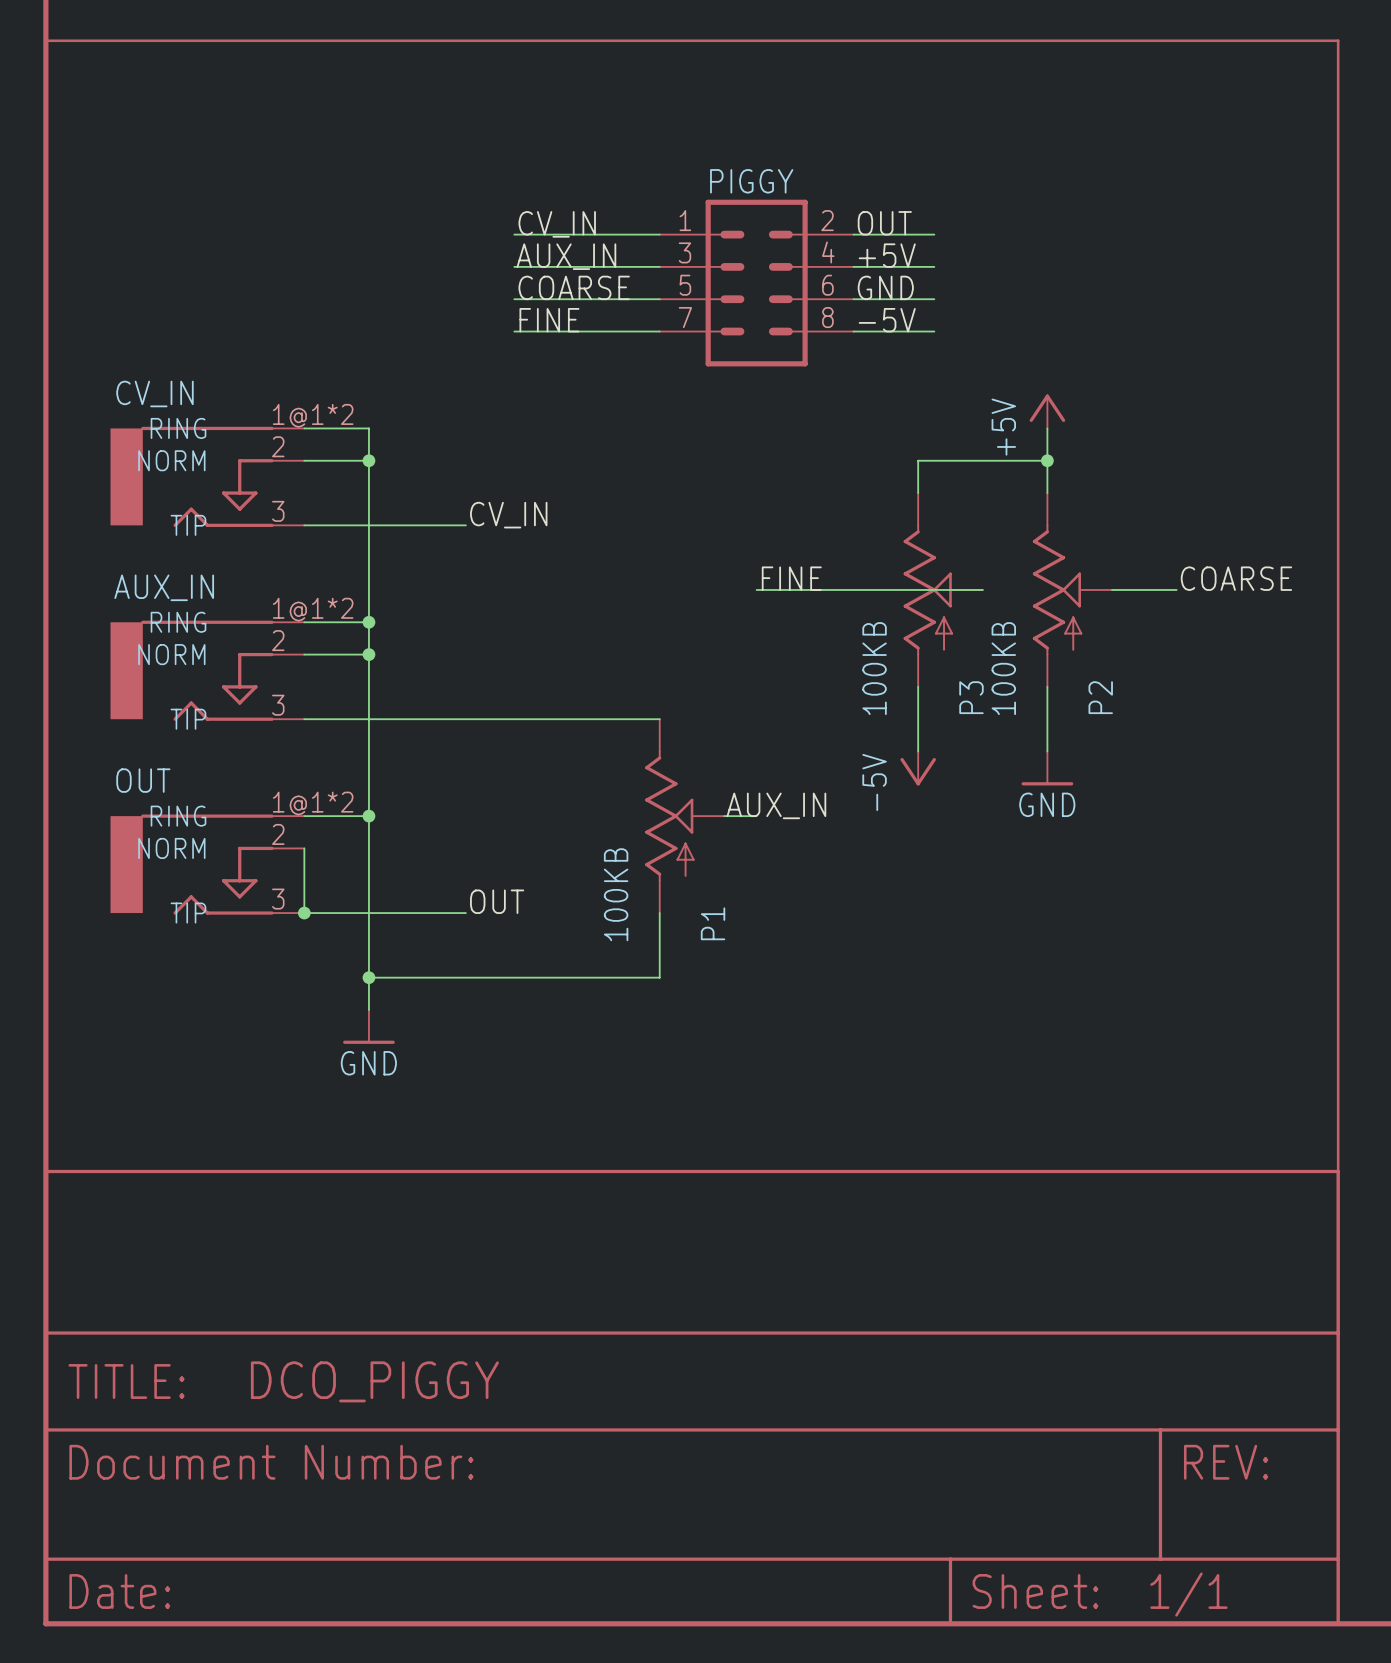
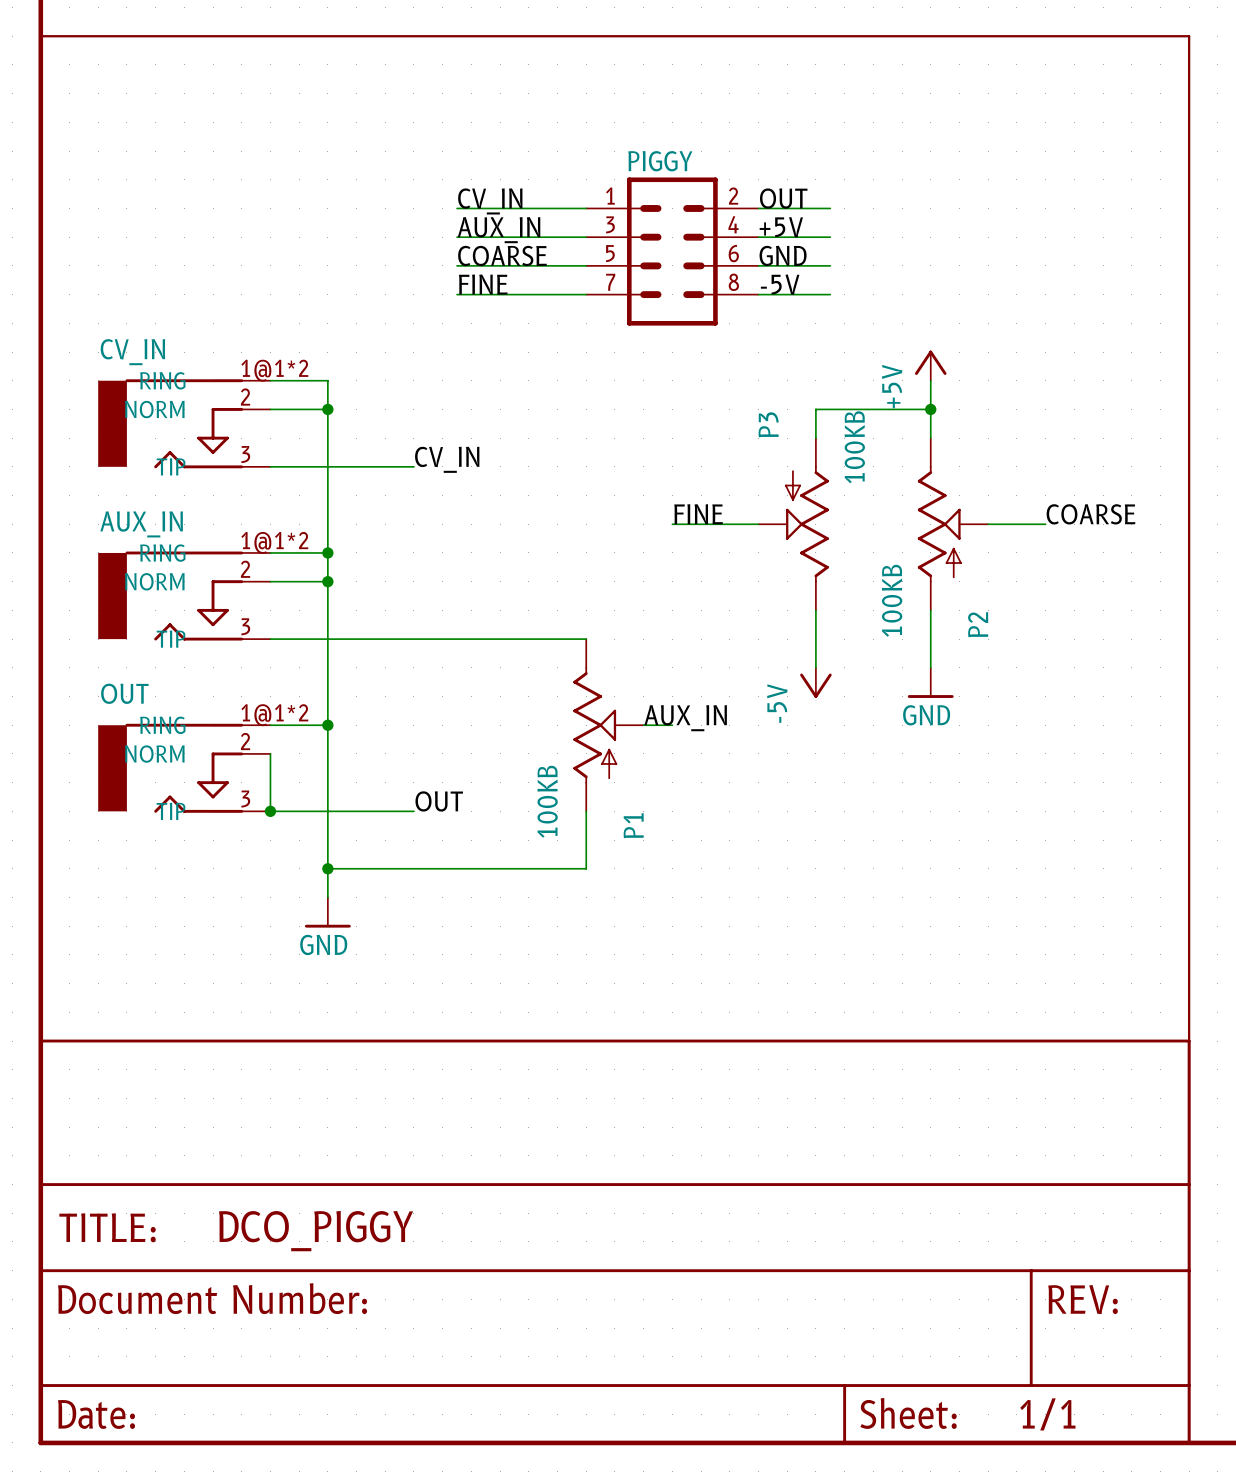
wire: (853, 589) (982, 589) -> none
P3 rotation: 0° (928, 589) -> 180° (806, 524)

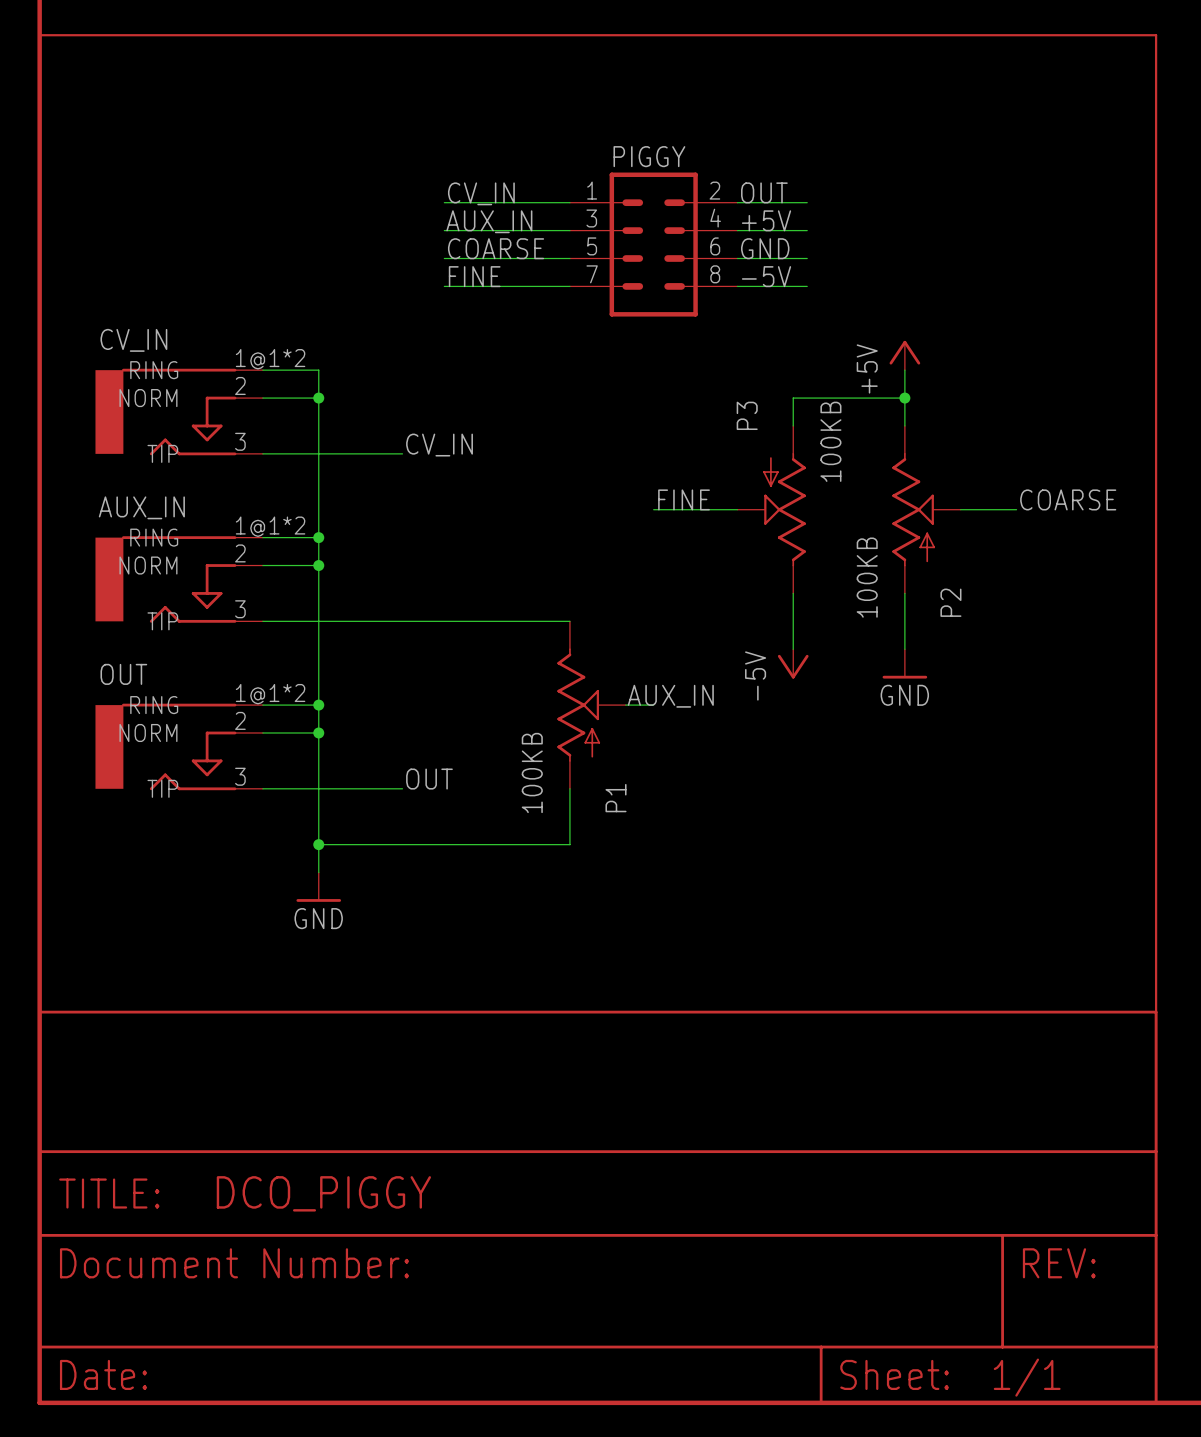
wire: (270, 753) (270, 811) -> (262, 732) (318, 732)
junction: none -> (318, 732)
junction: (270, 811) -> none

